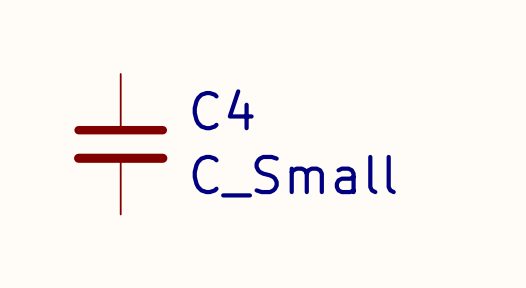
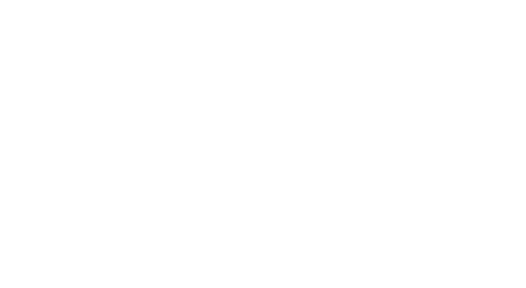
C4: C_Small (120, 144) -> none

